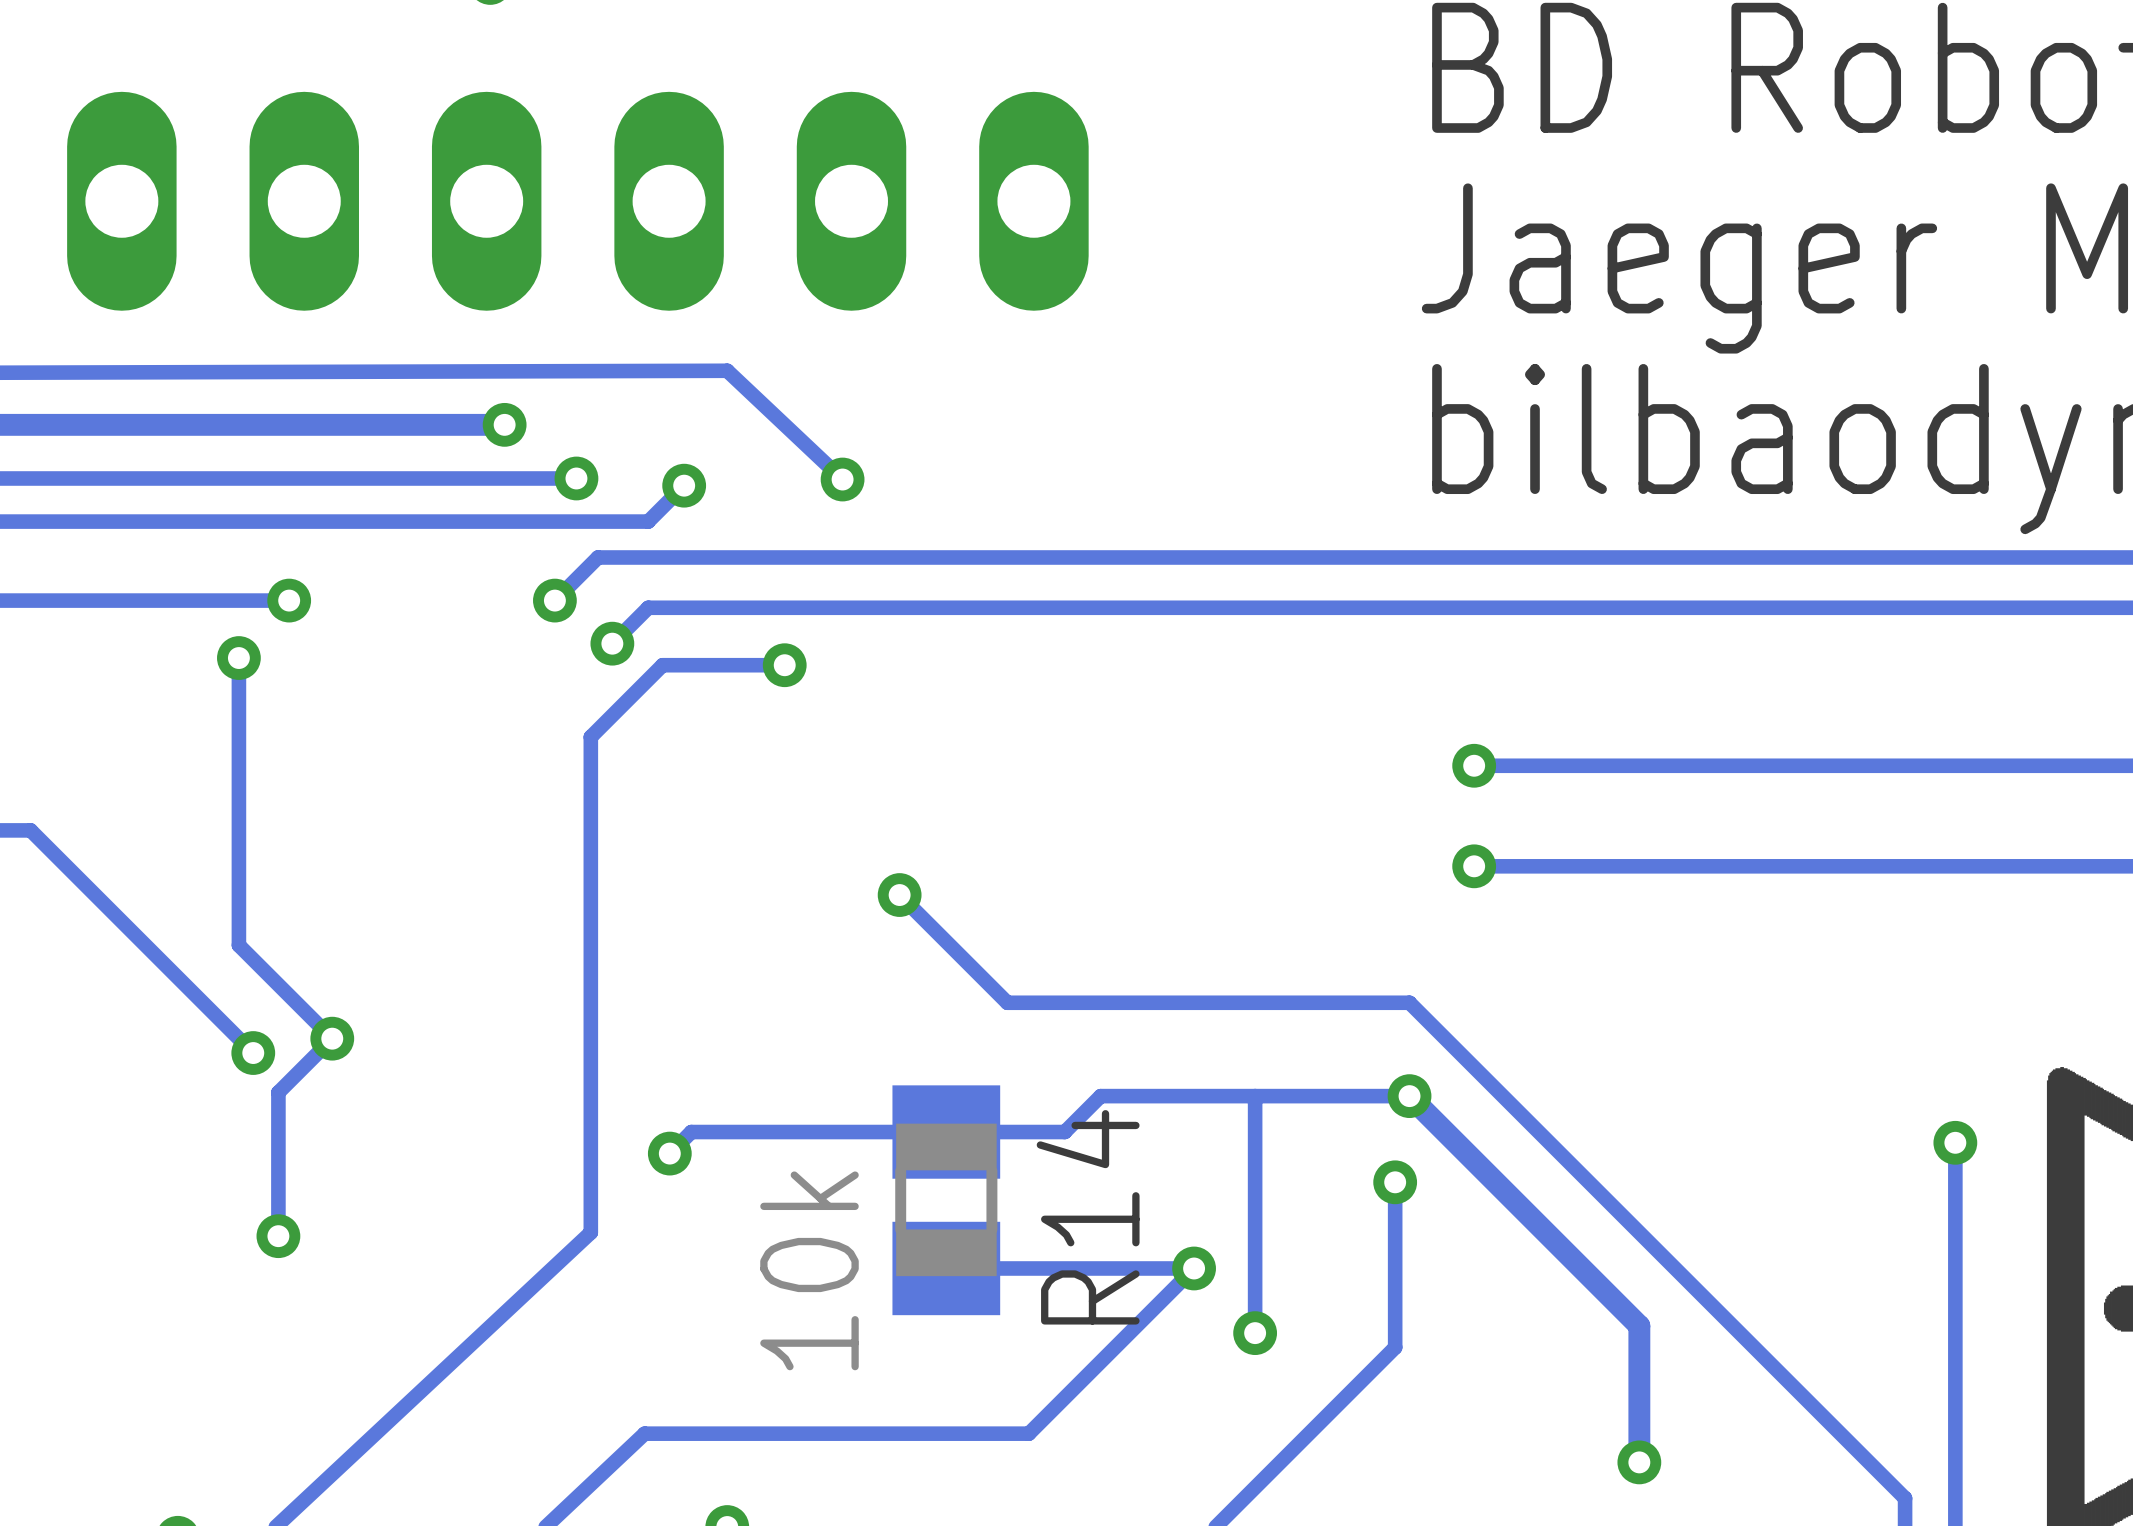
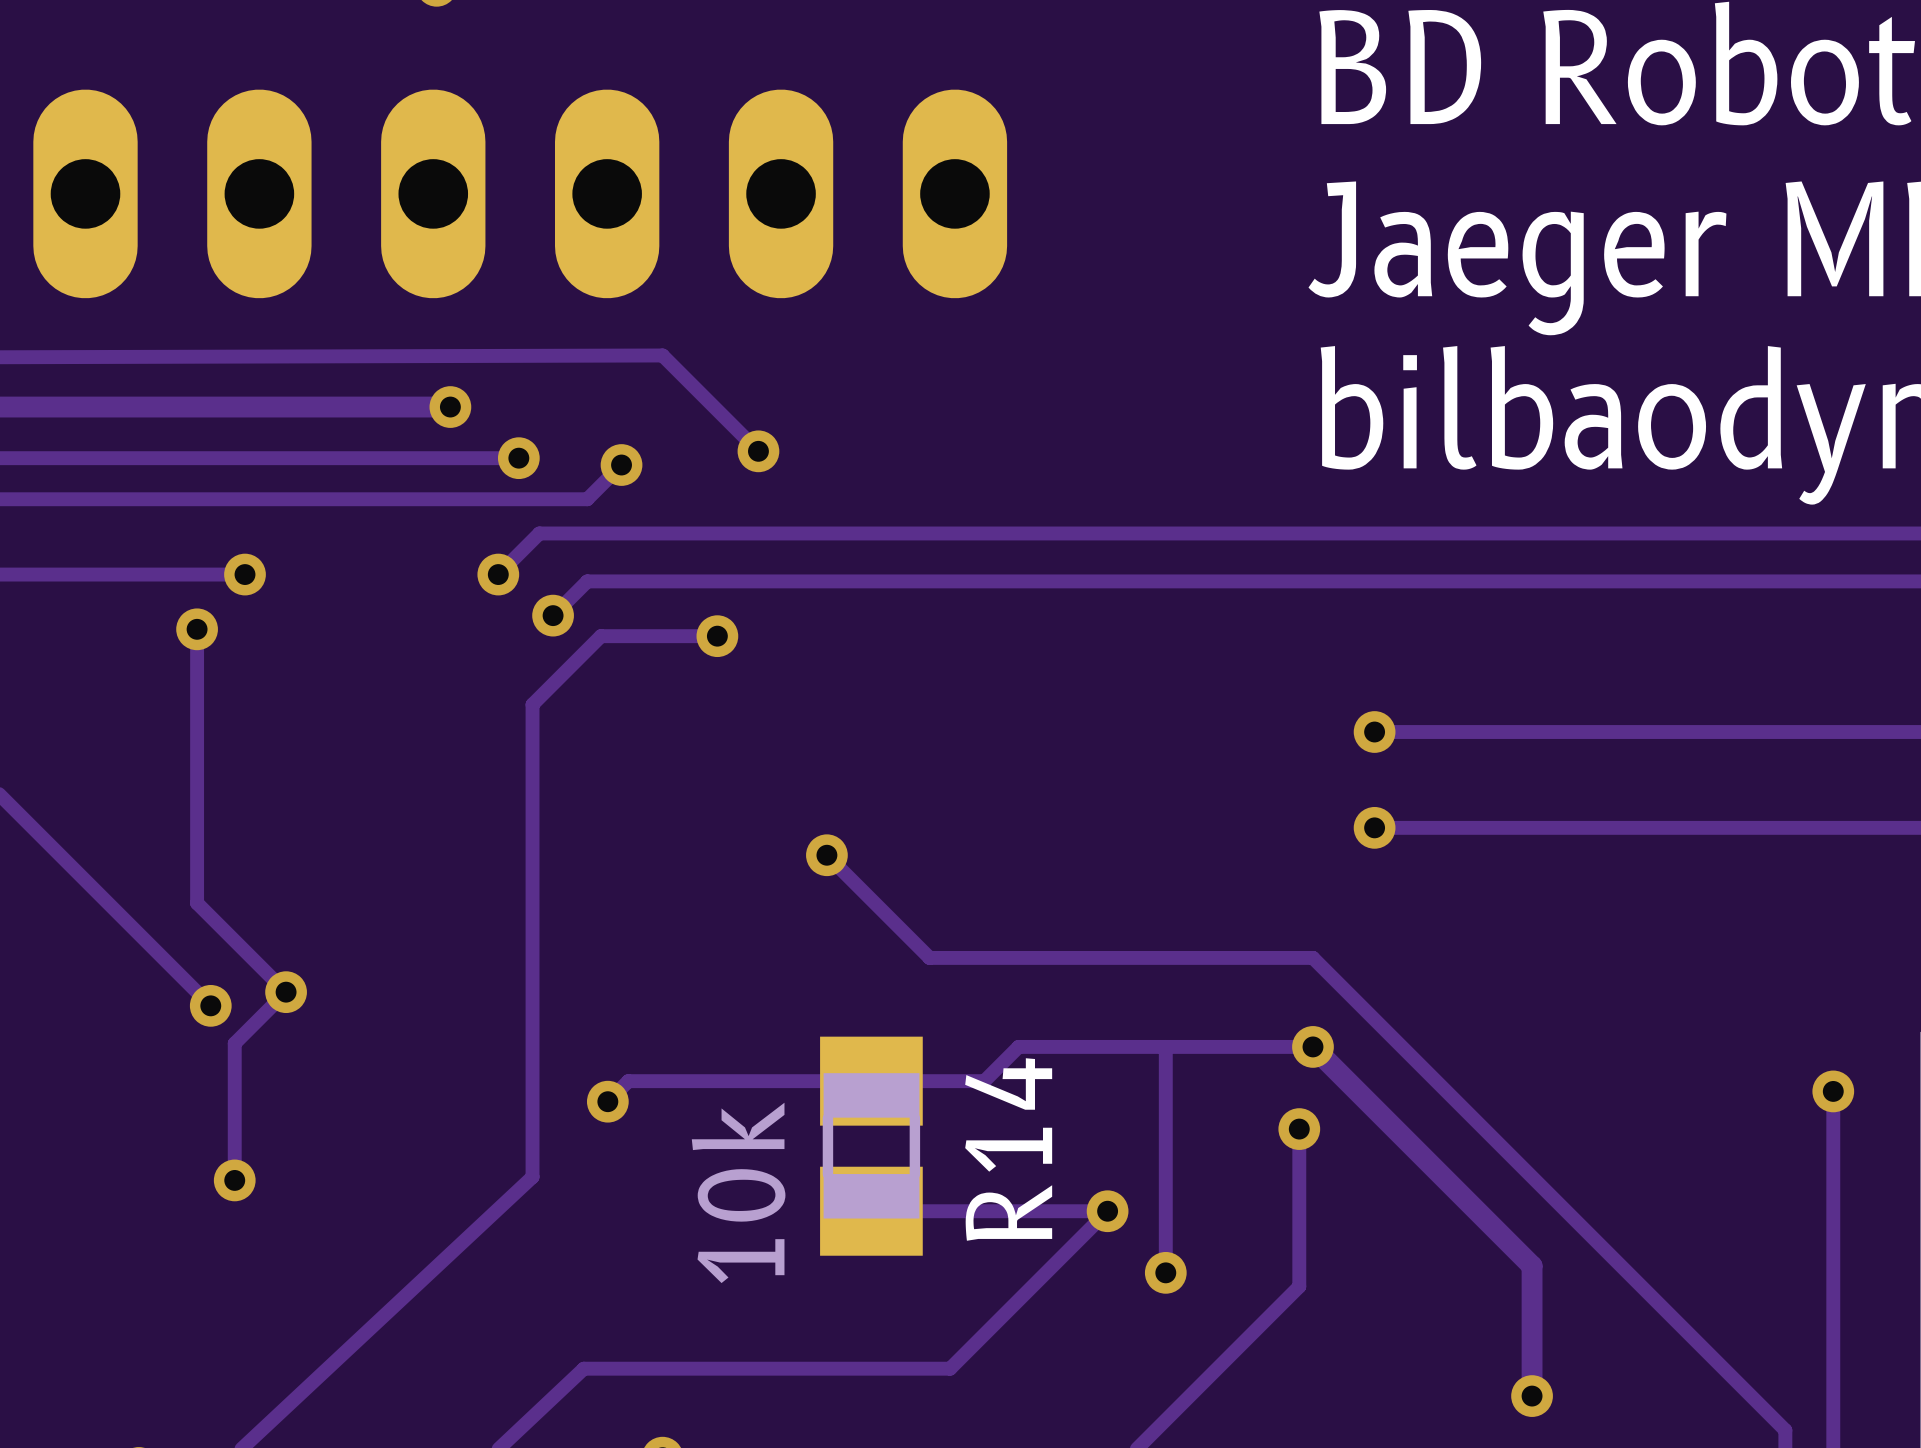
track: (727, 370) (842, 479) -> (662, 355) (758, 451)
via position: (842, 479) -> (758, 451)

